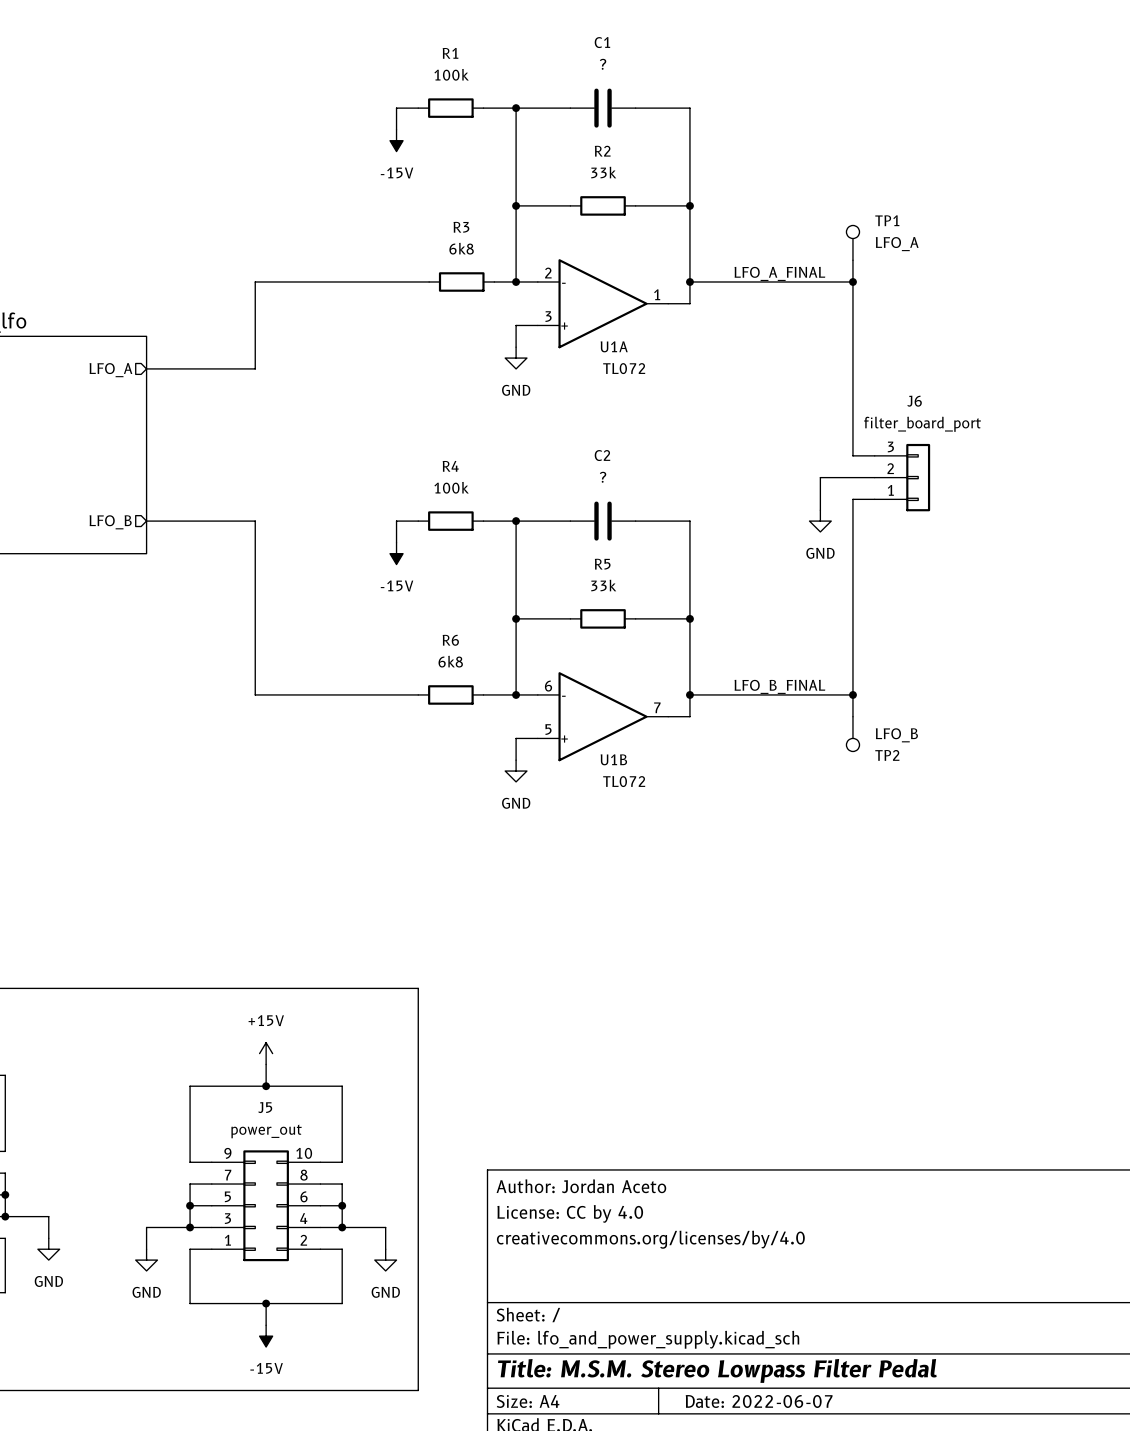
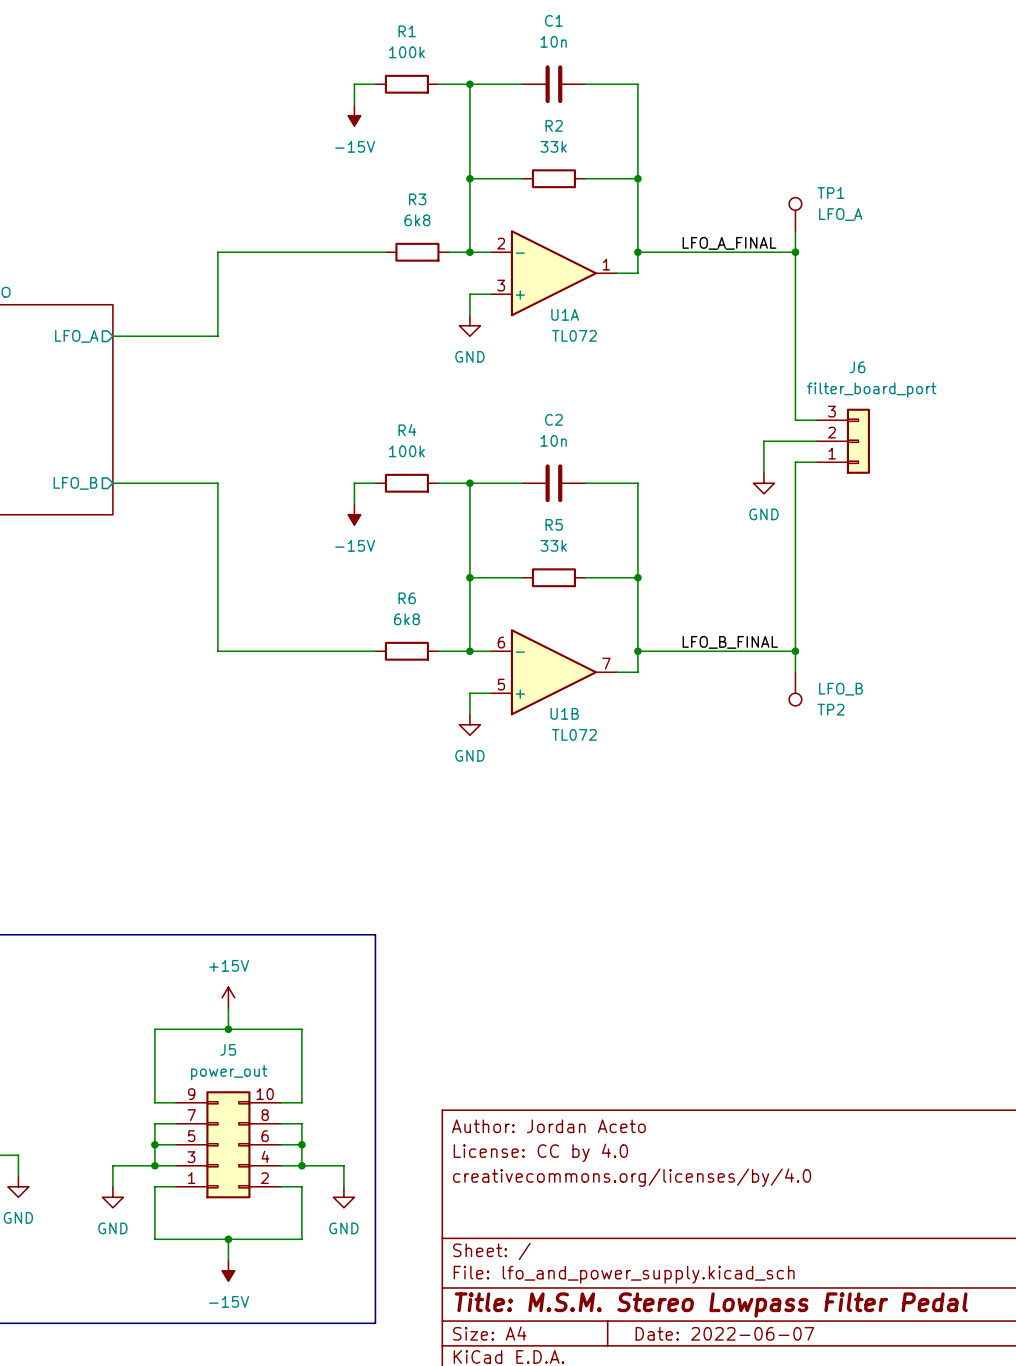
C1 value: ? (603, 64) -> 10n (553, 41)
C2 value: ? (603, 477) -> 10n (553, 440)

